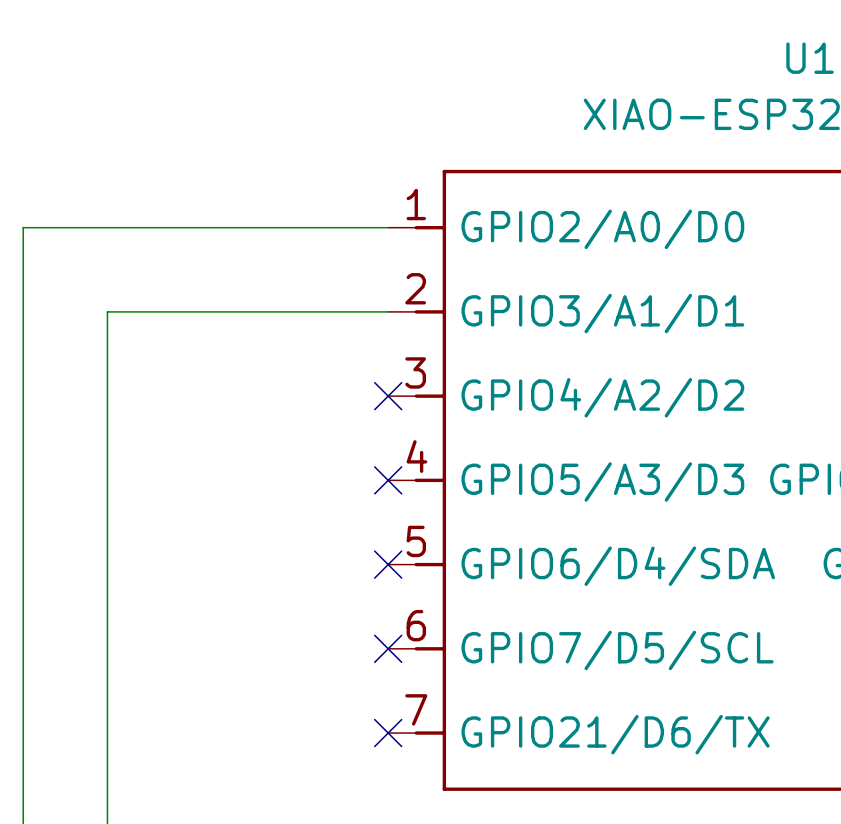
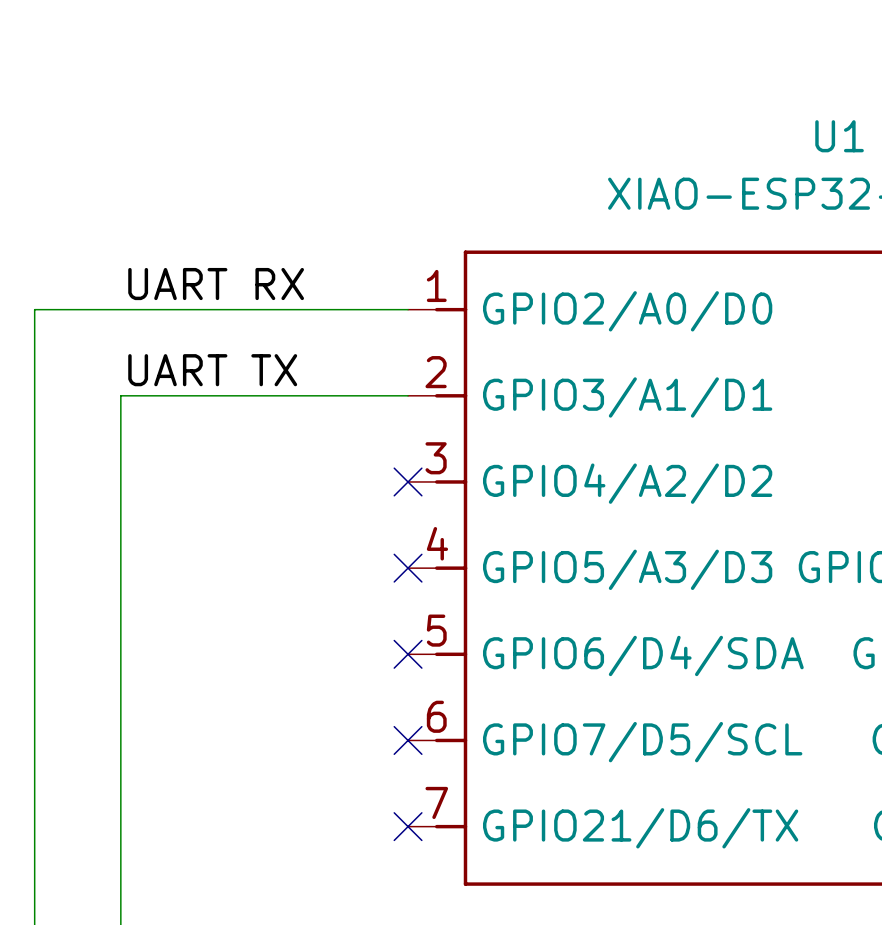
label: none -> UART RX (216, 284)
label: none -> UART TX (212, 370)

